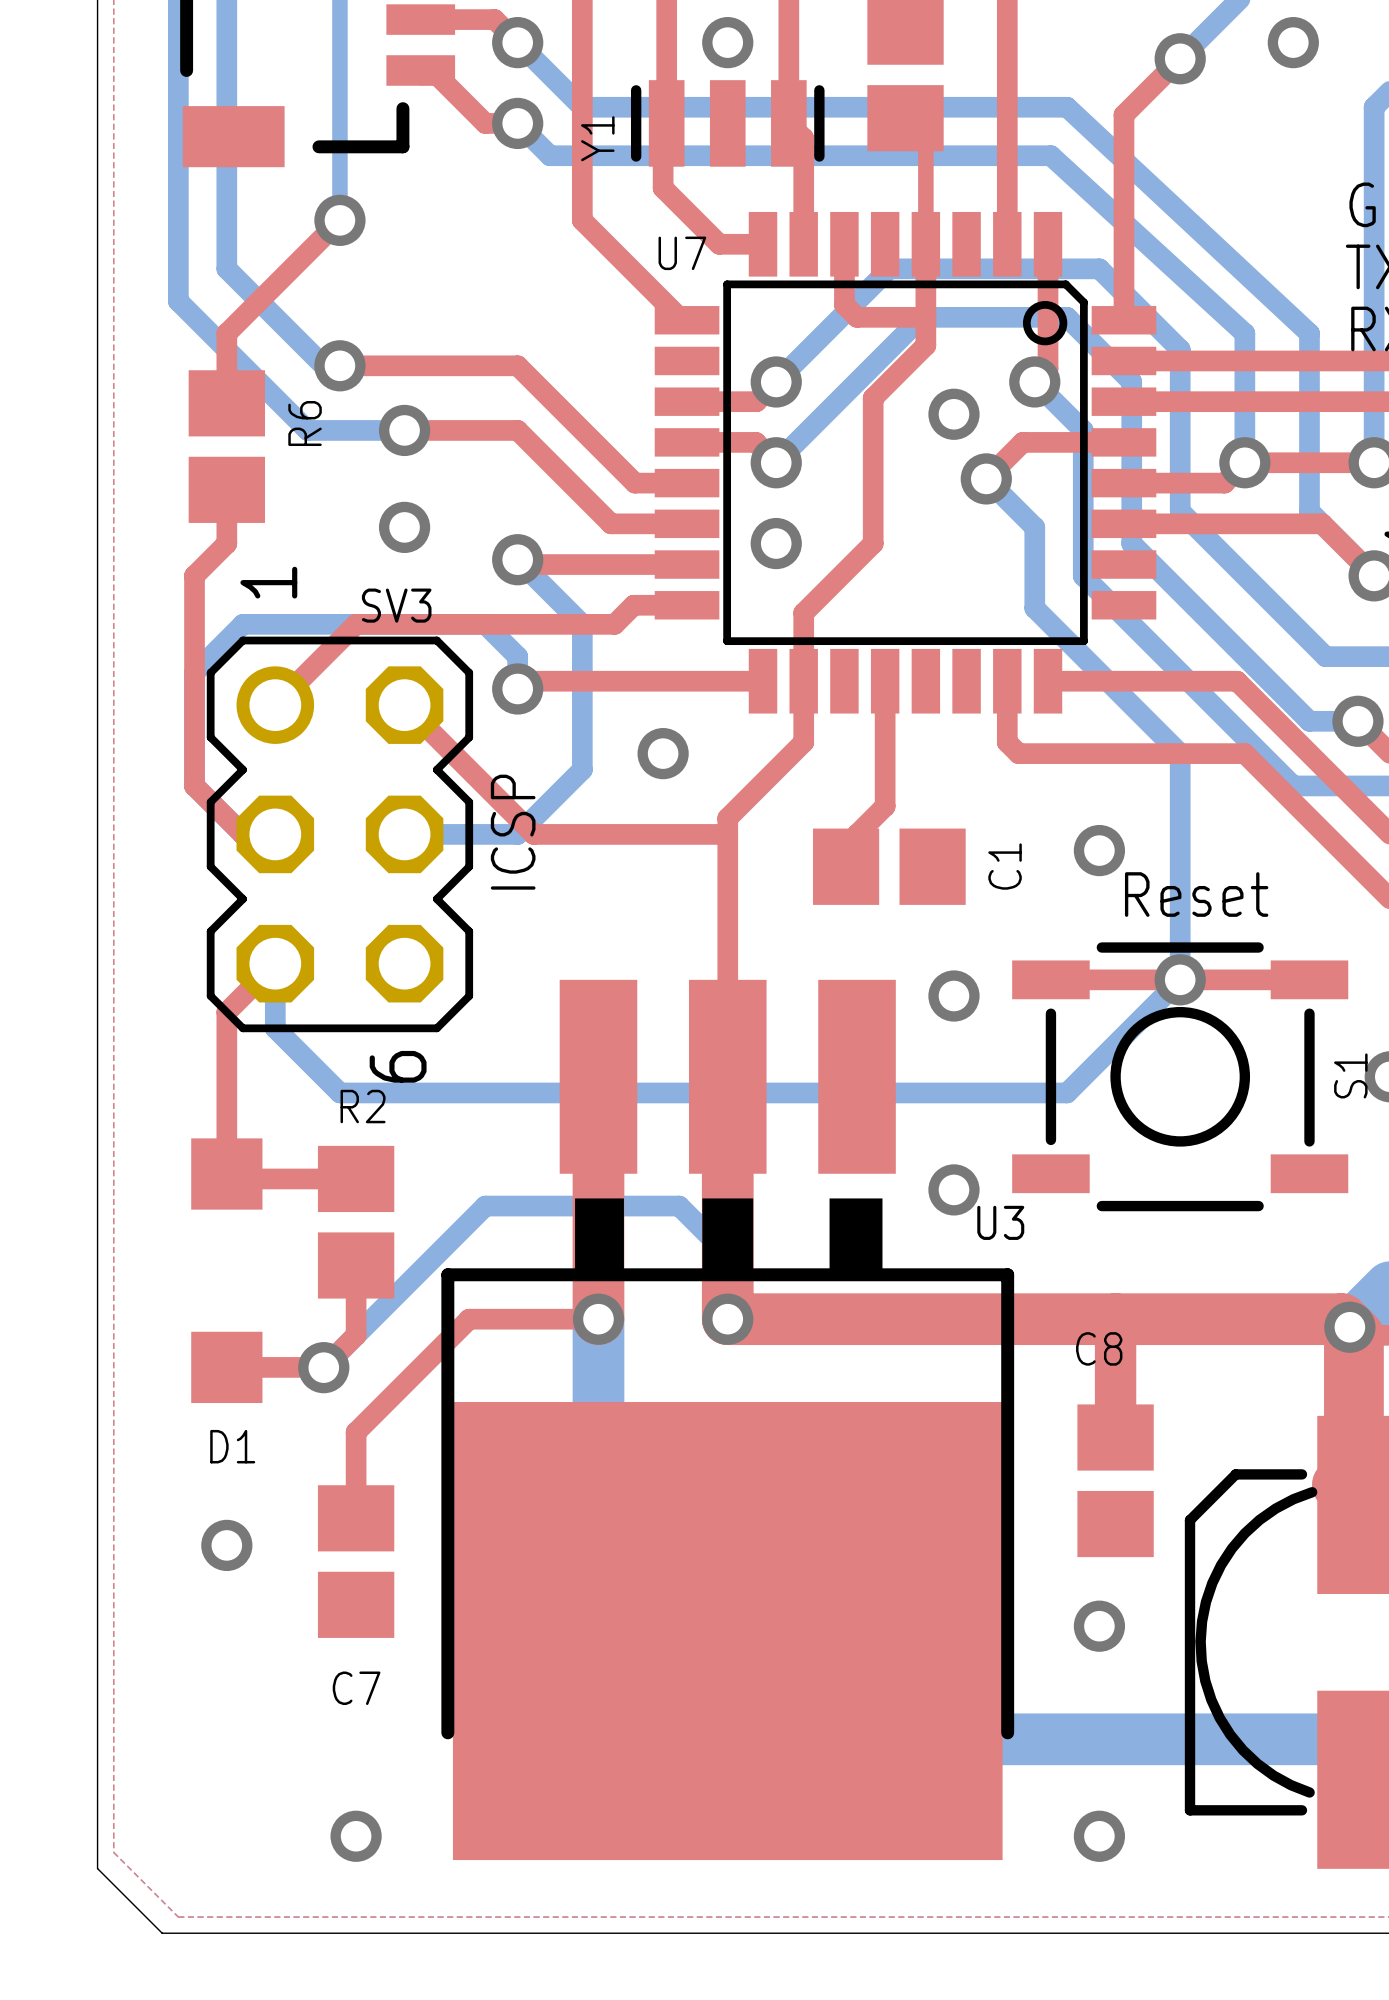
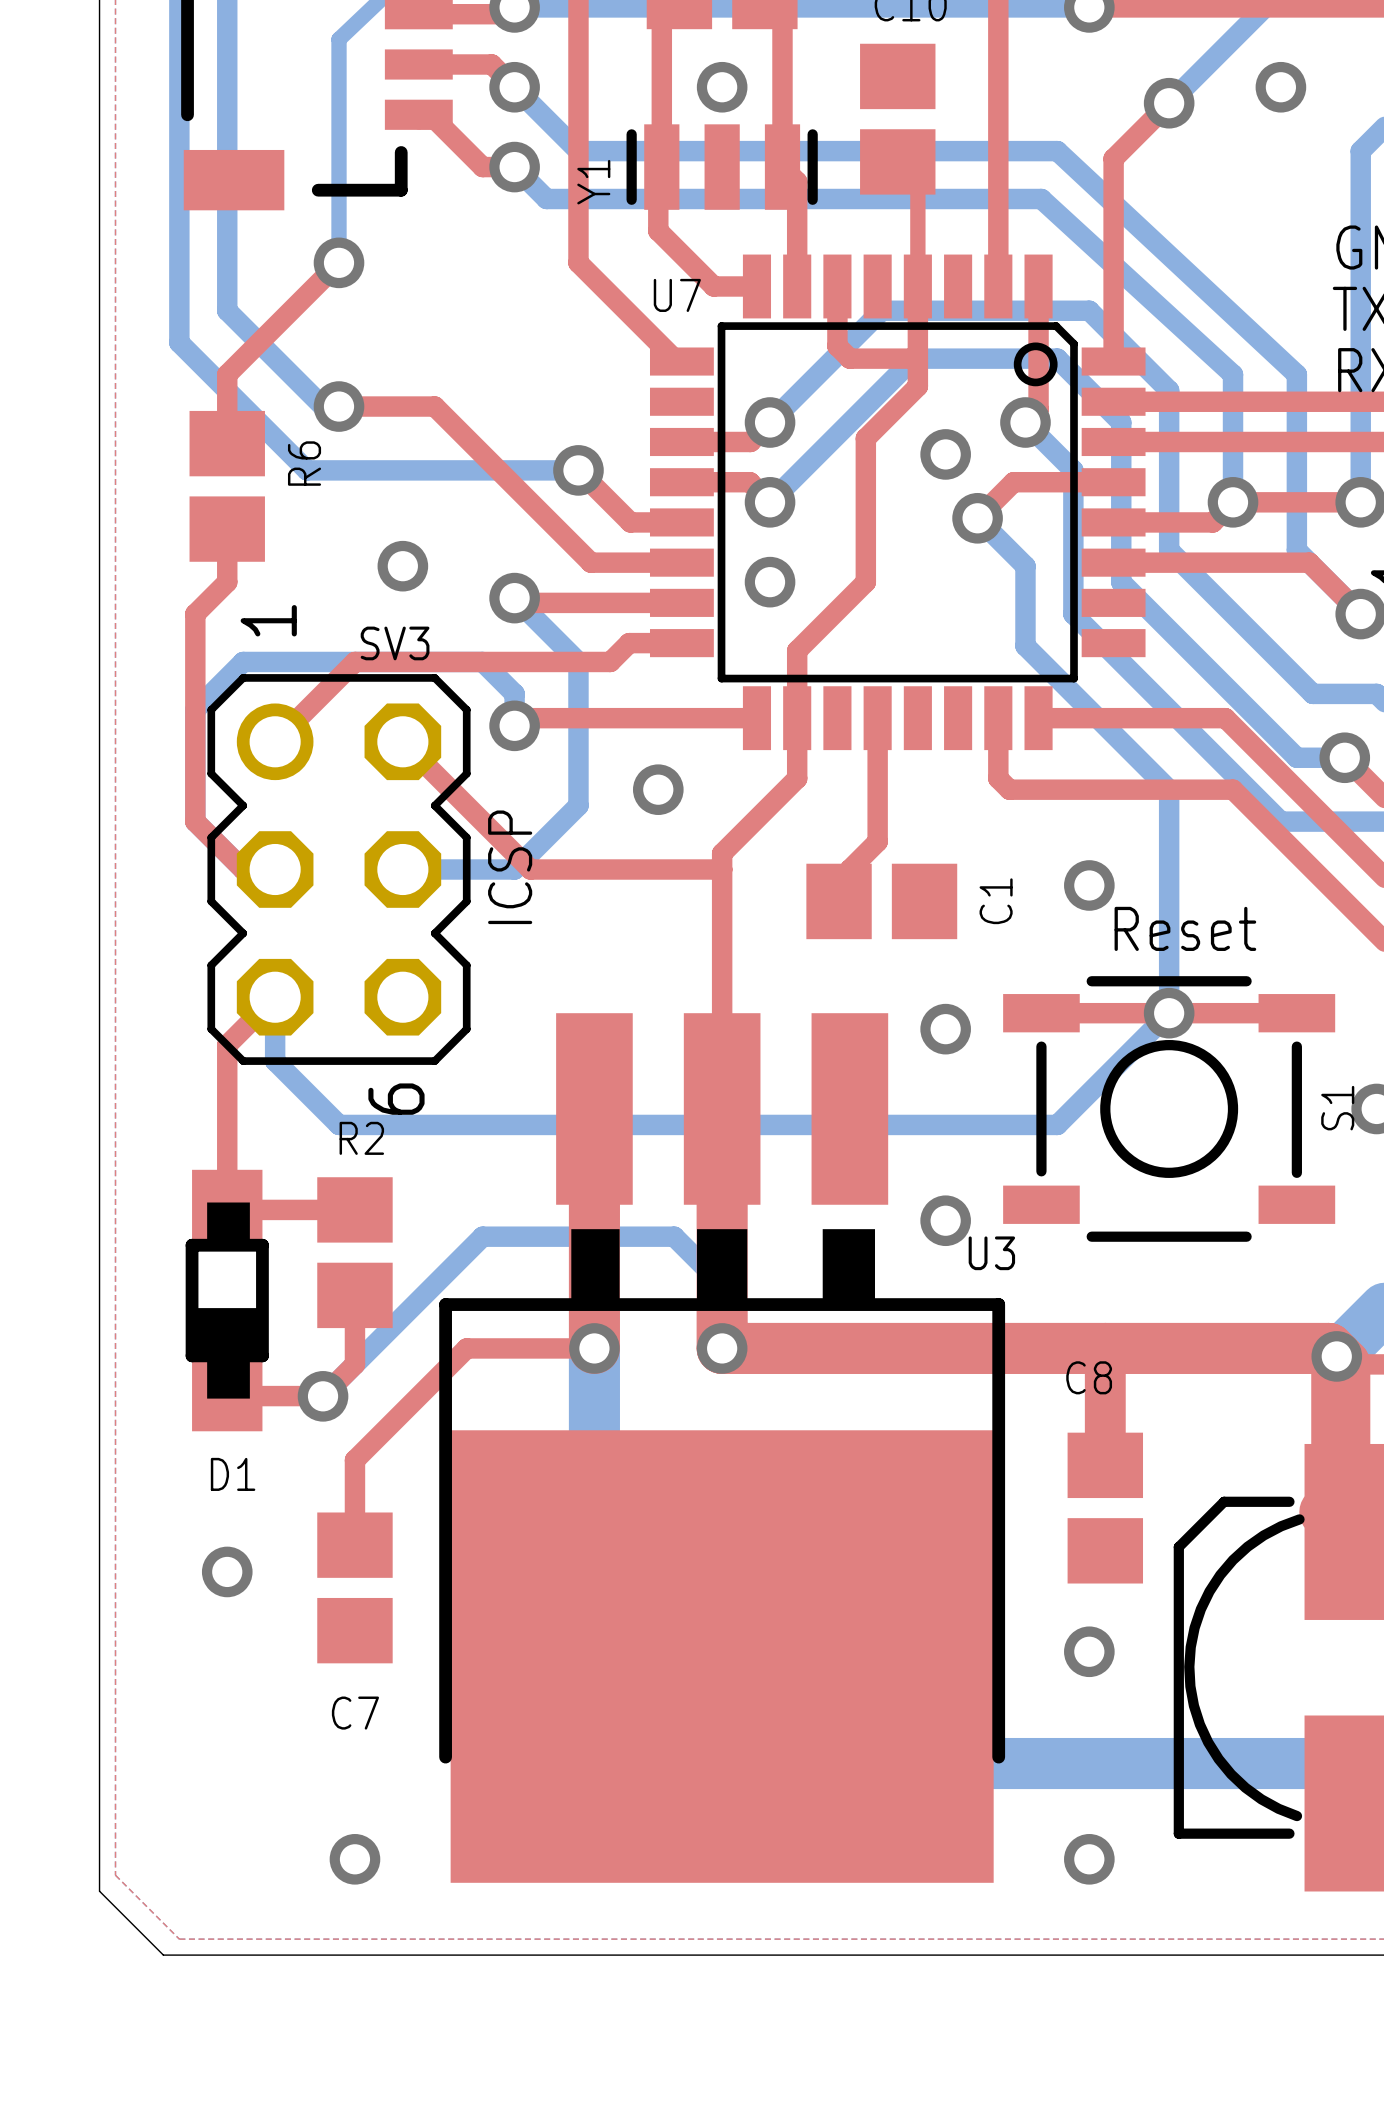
top track: (436, 365) (517, 365) (582, 430) -> none
top track: (404, 430) (517, 430) (611, 523) -> (434, 406) (590, 562) (606, 562)
bottom track: none -> (402, 470) (578, 470)
via position: (404, 430) -> (578, 470)
D1 footprint: [191, 1138, 263, 1404] -> [185, 1169, 269, 1432]

